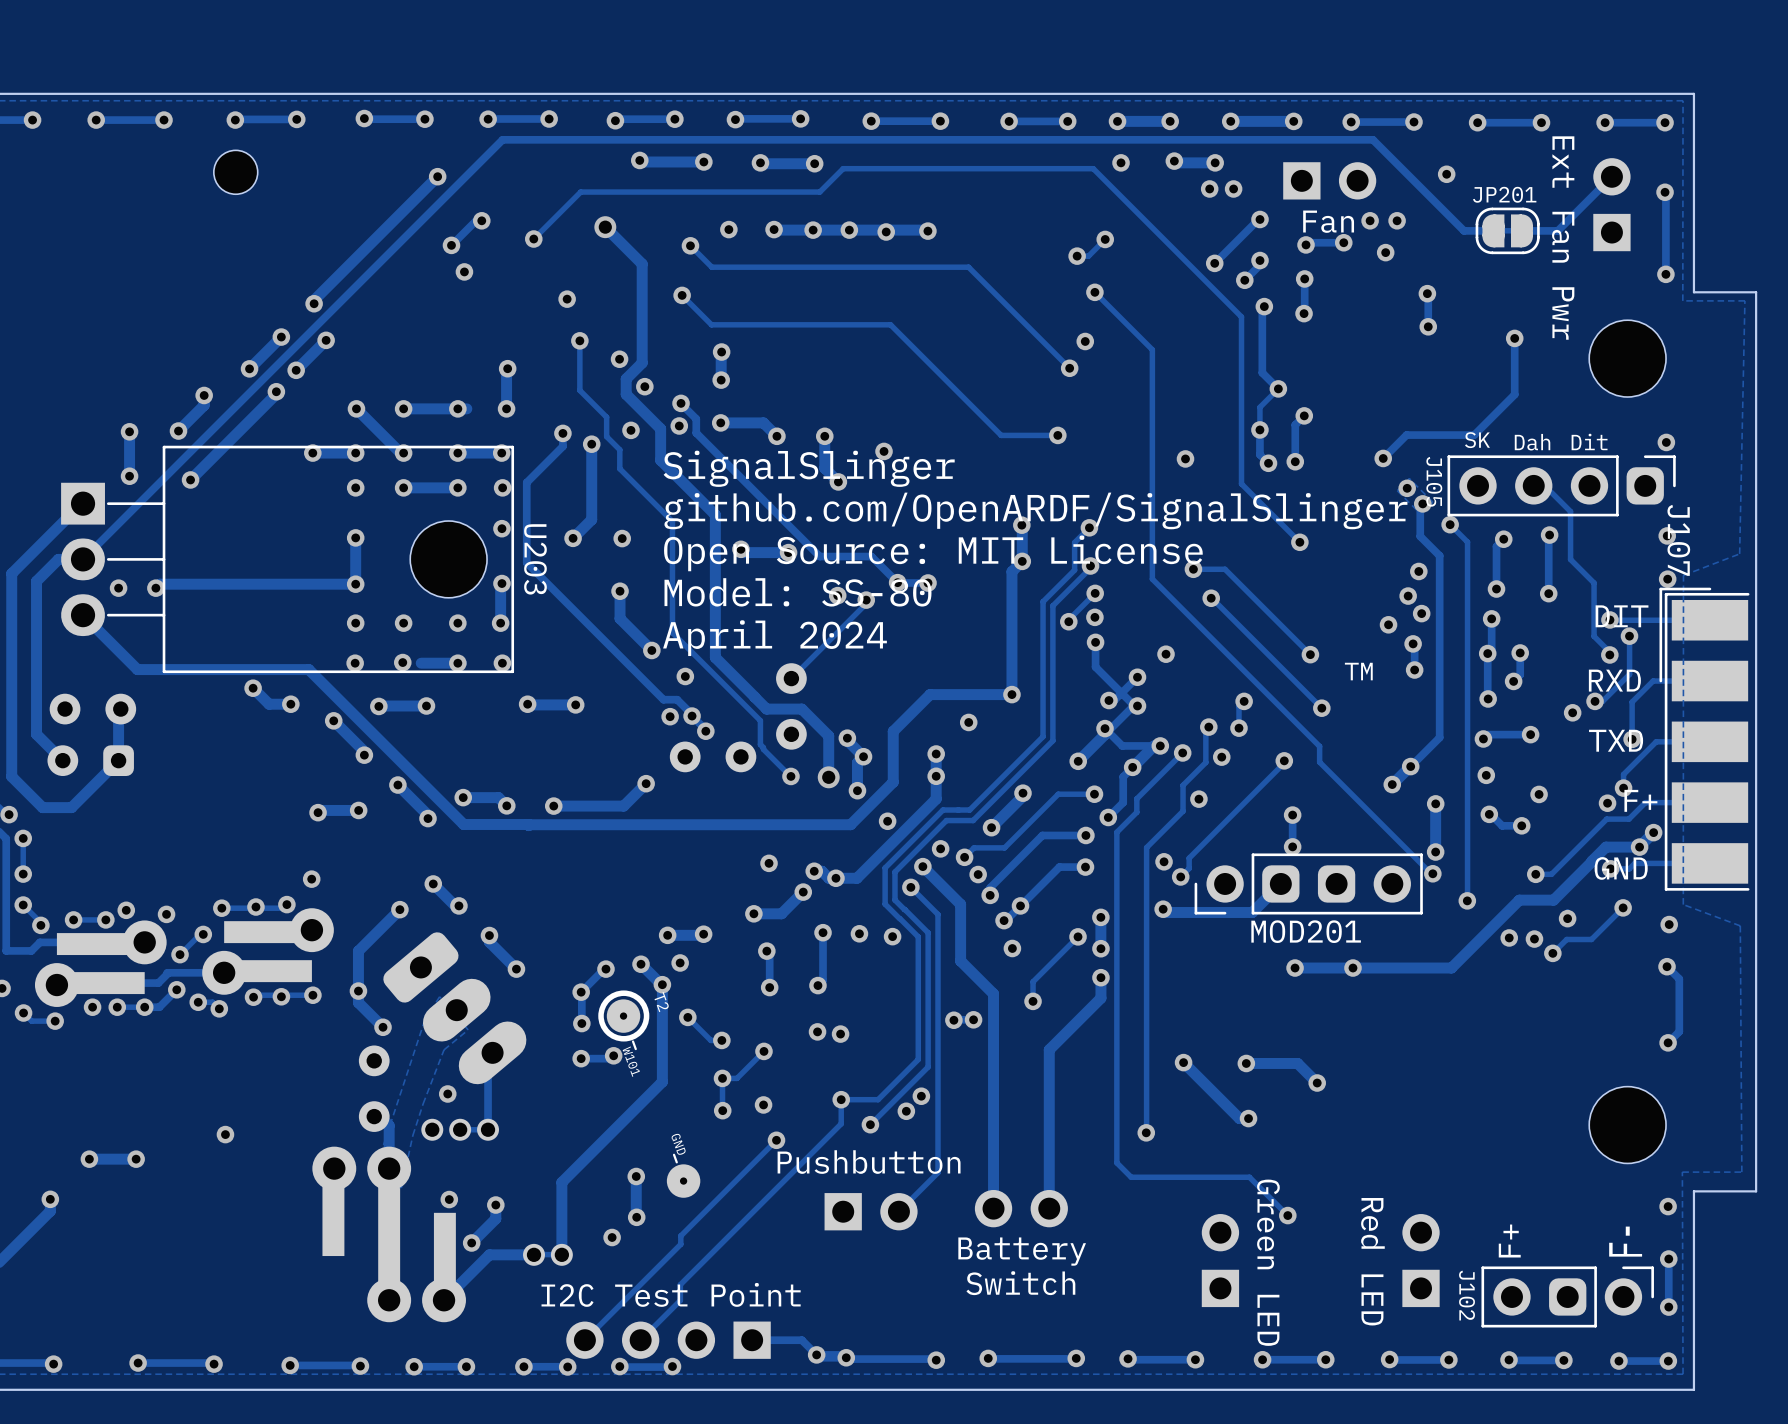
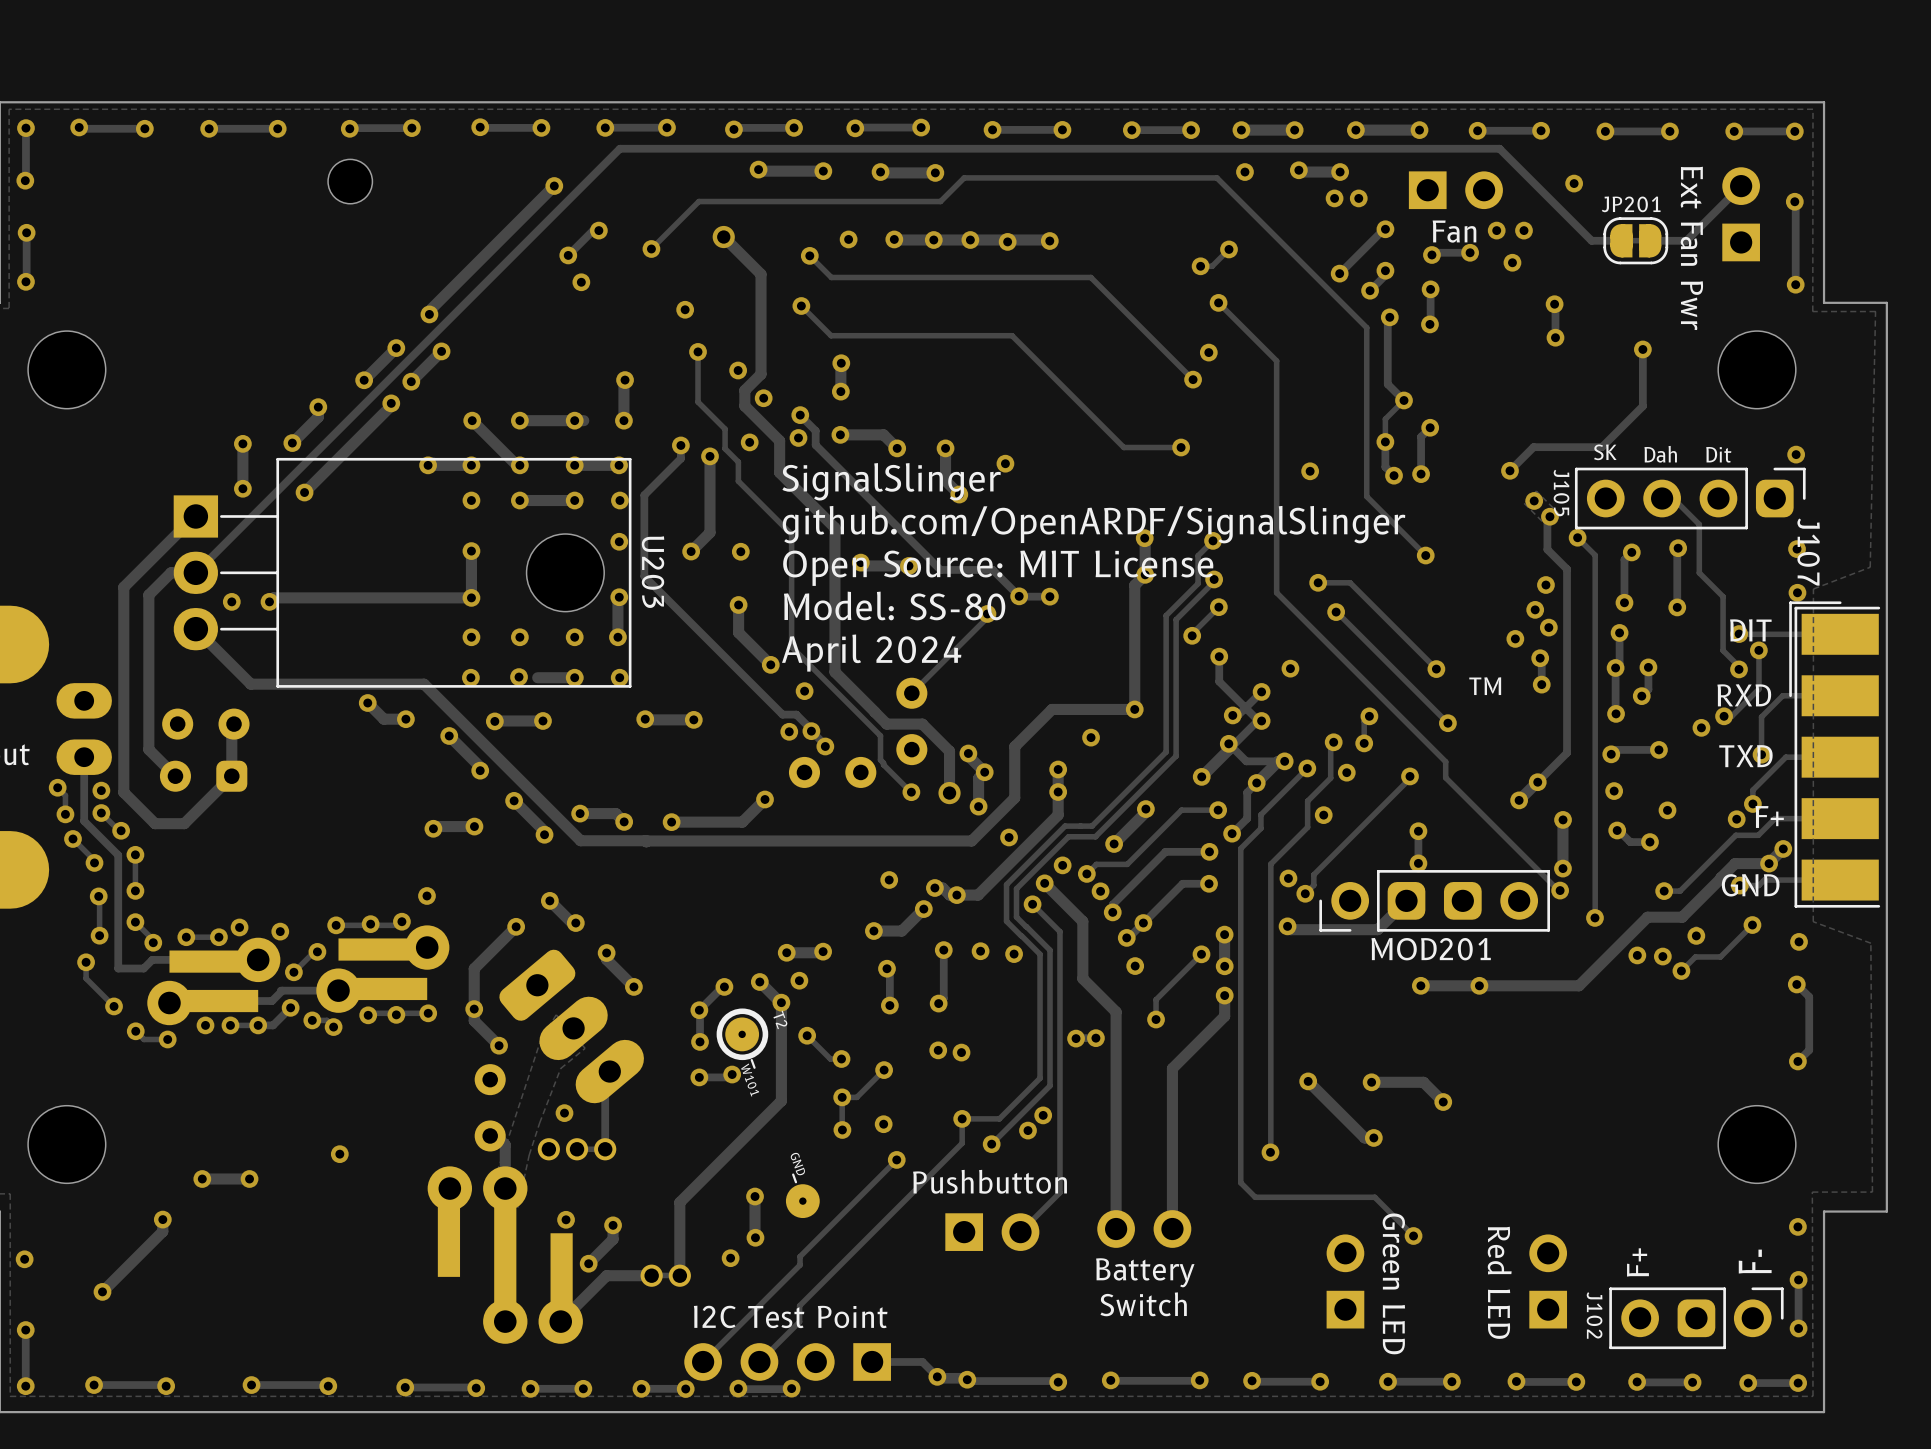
via: (837, 595) -> none
via: (1094, 617) -> none

